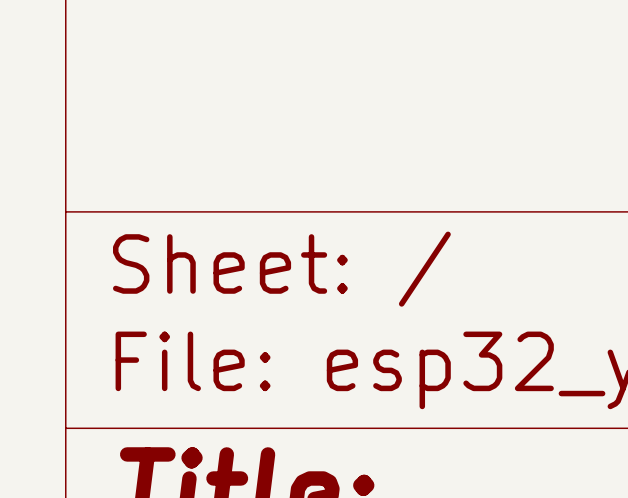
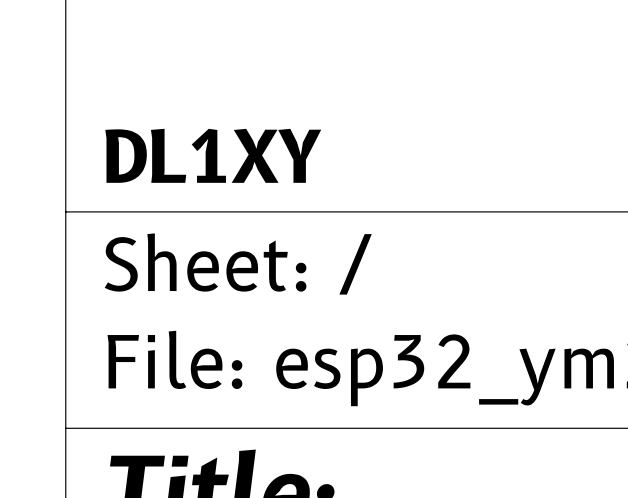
title block: none -> DL1XY (213, 155)

